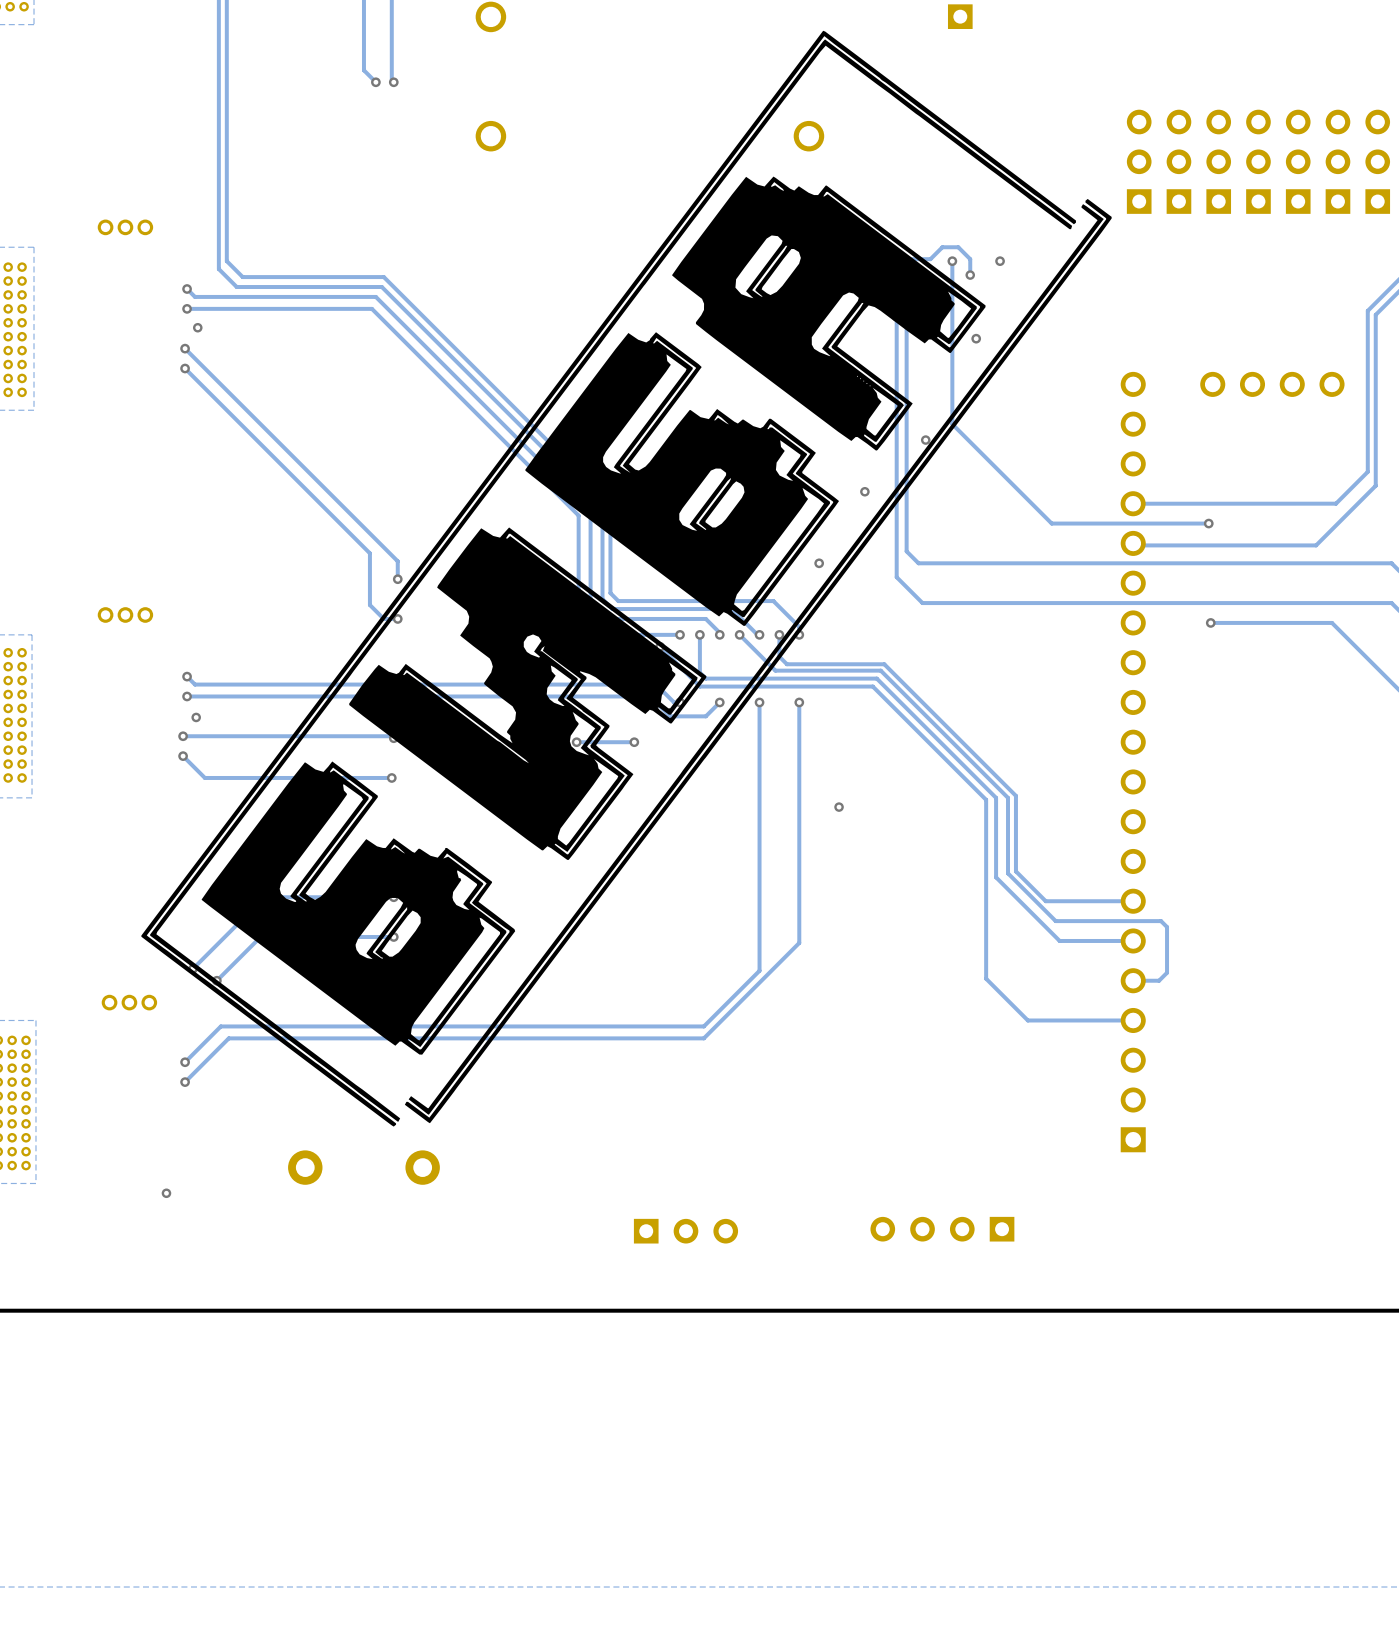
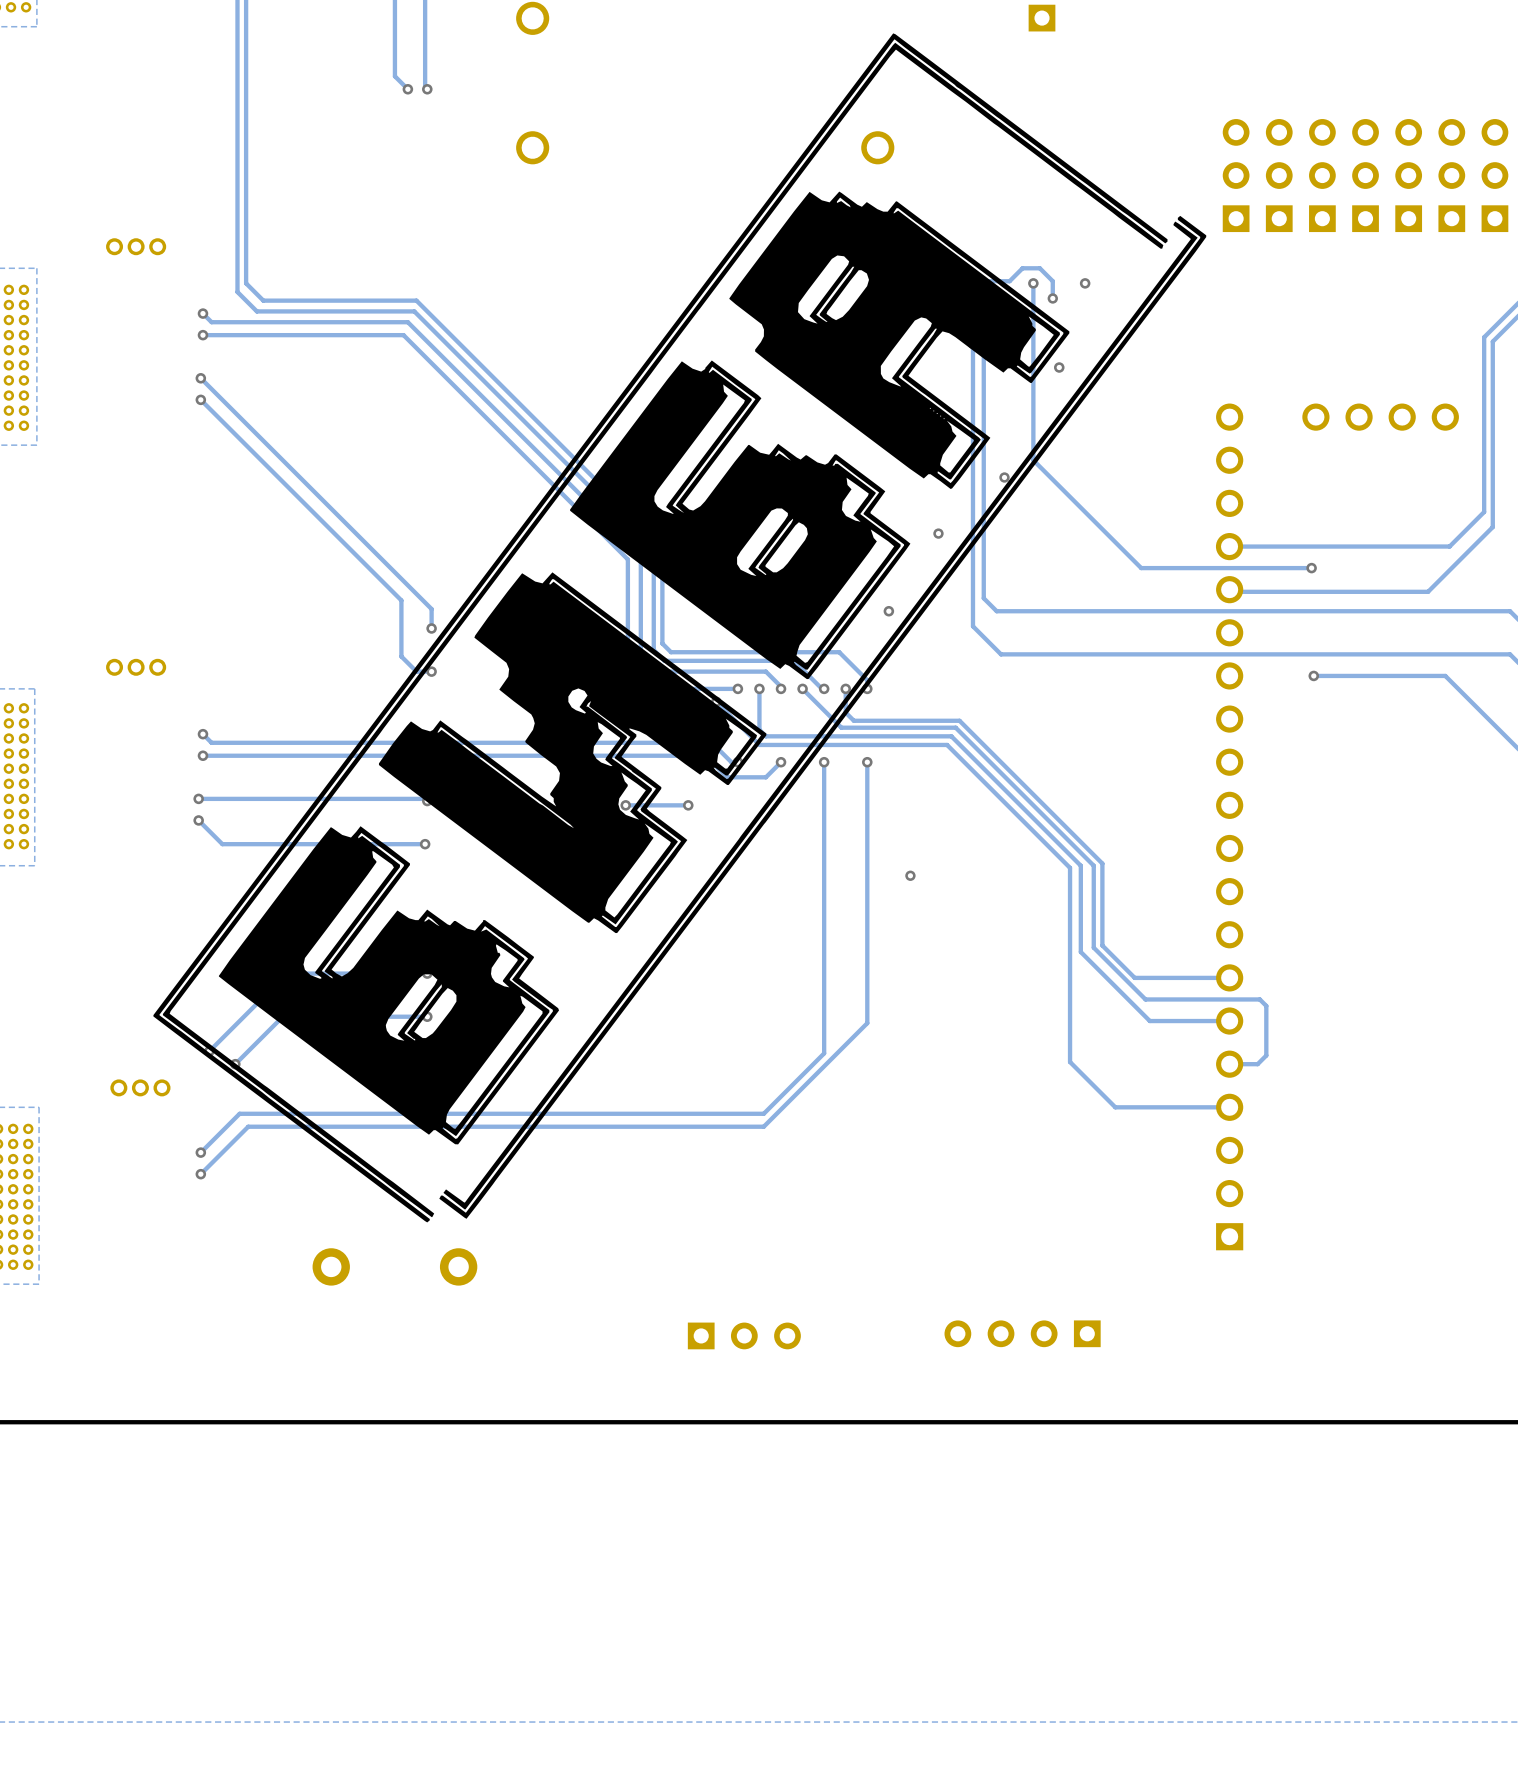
via: (197, 327) -> none
via: (196, 717) -> none
via: (166, 1193) -> none

